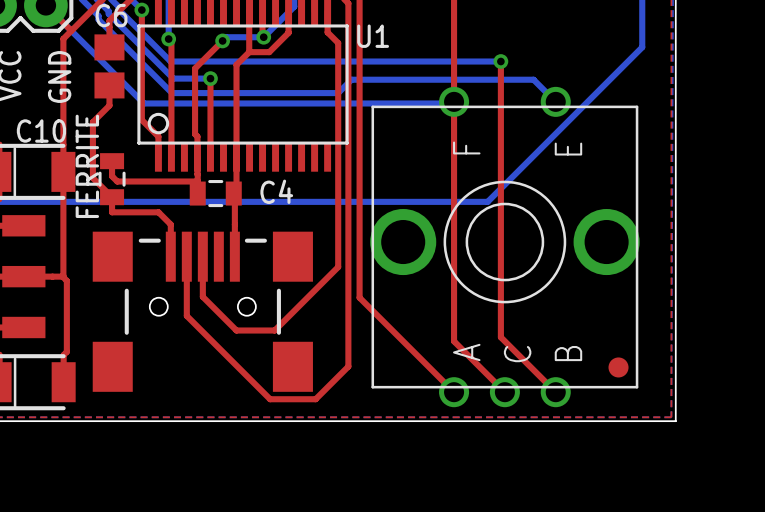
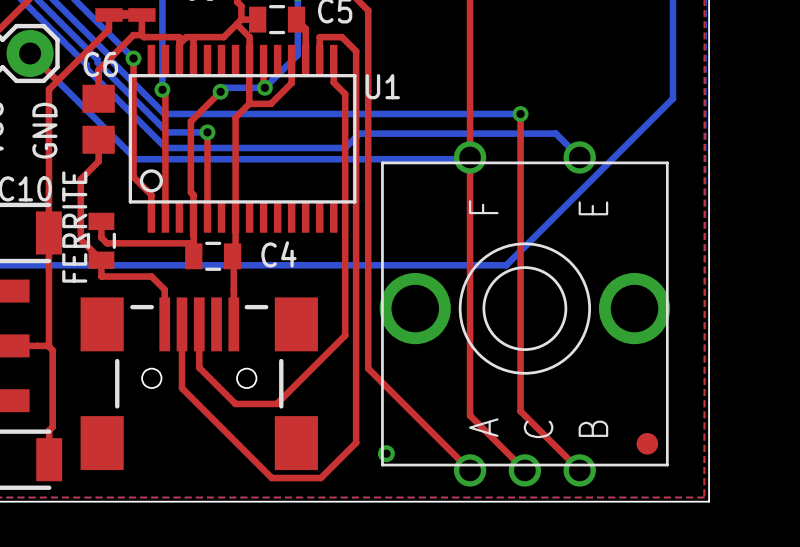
via: none -> (386, 453)

